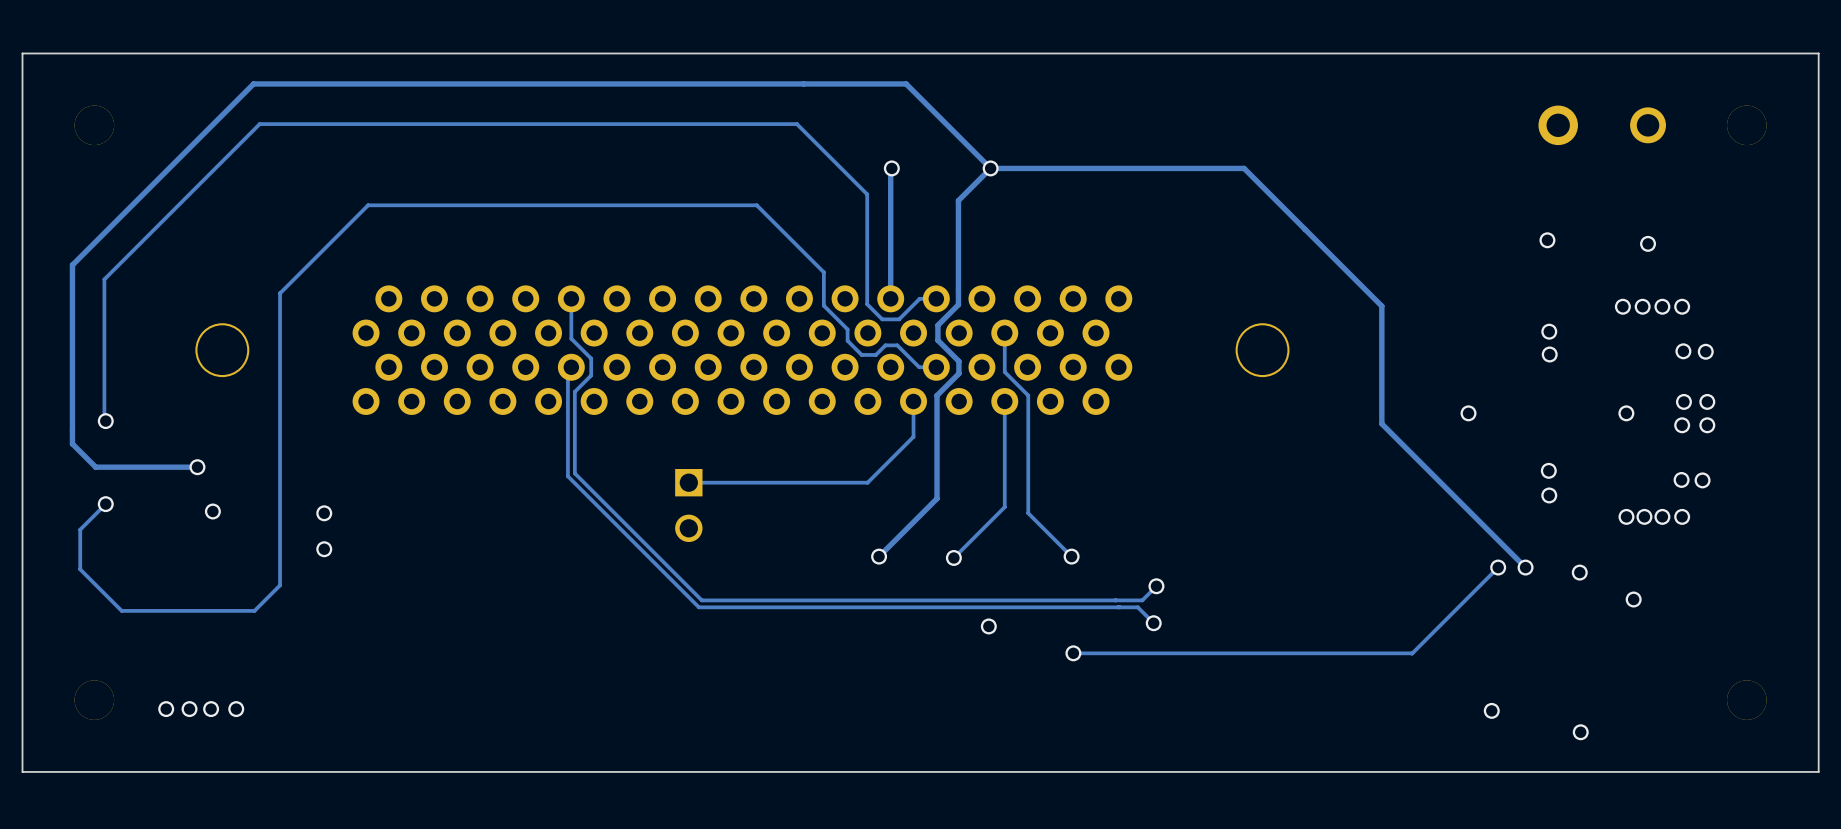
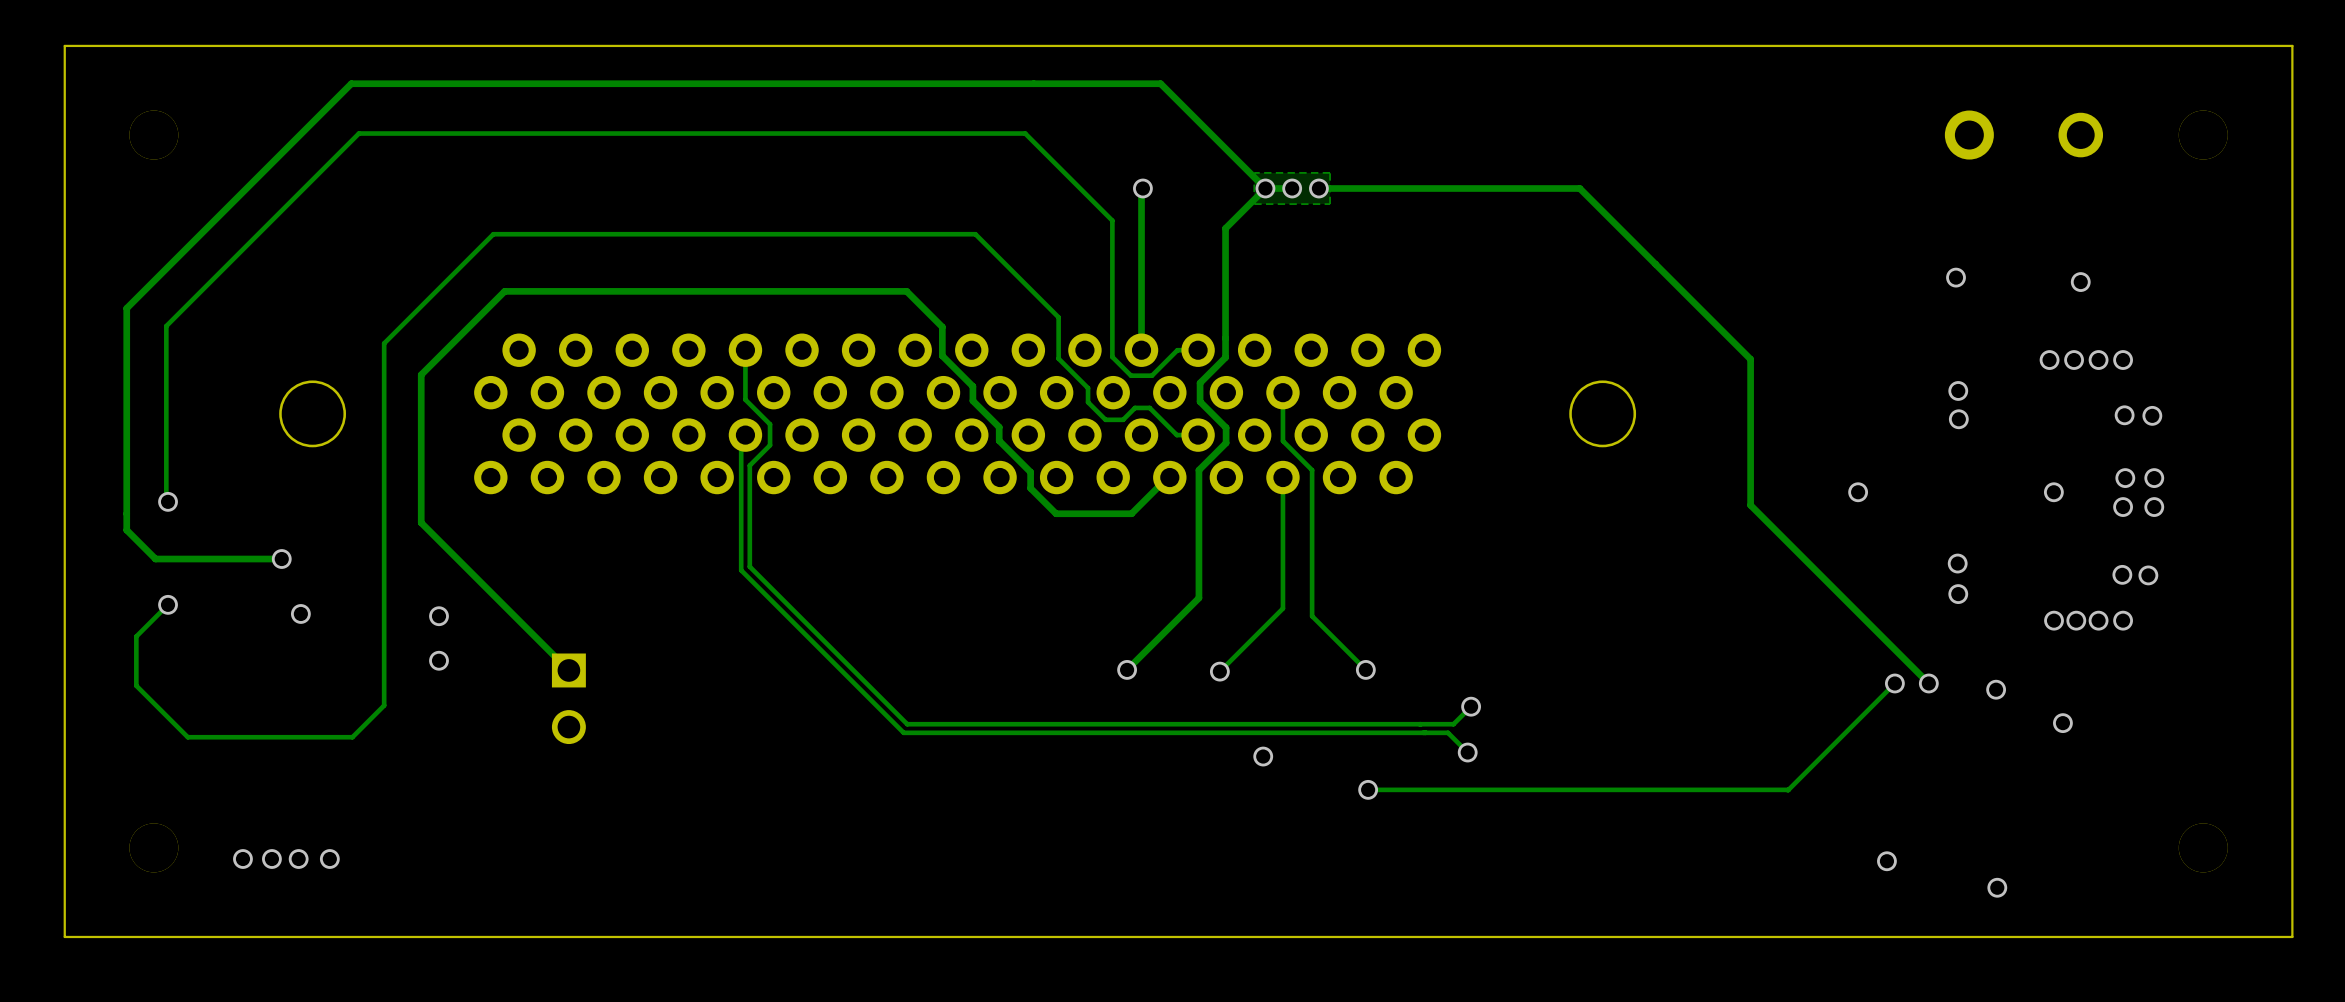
zone outline: none -> (1330, 172) (1254, 172) (1254, 204) (1330, 204) (1330, 172)
via: none -> (1292, 188)
track: (1033, 168) (1012, 168) -> none
via: none -> (1318, 188)
track: (913, 401) (913, 436) (867, 482) (688, 482) -> (1169, 477) (1131, 513) (1056, 513) (1030, 488) (1030, 472) (999, 440) (999, 427) (972, 400) (972, 386) (942, 355) (942, 327) (906, 291) (504, 291) (421, 374) (421, 522) (568, 670)
part position: (688, 505) -> (568, 698)

